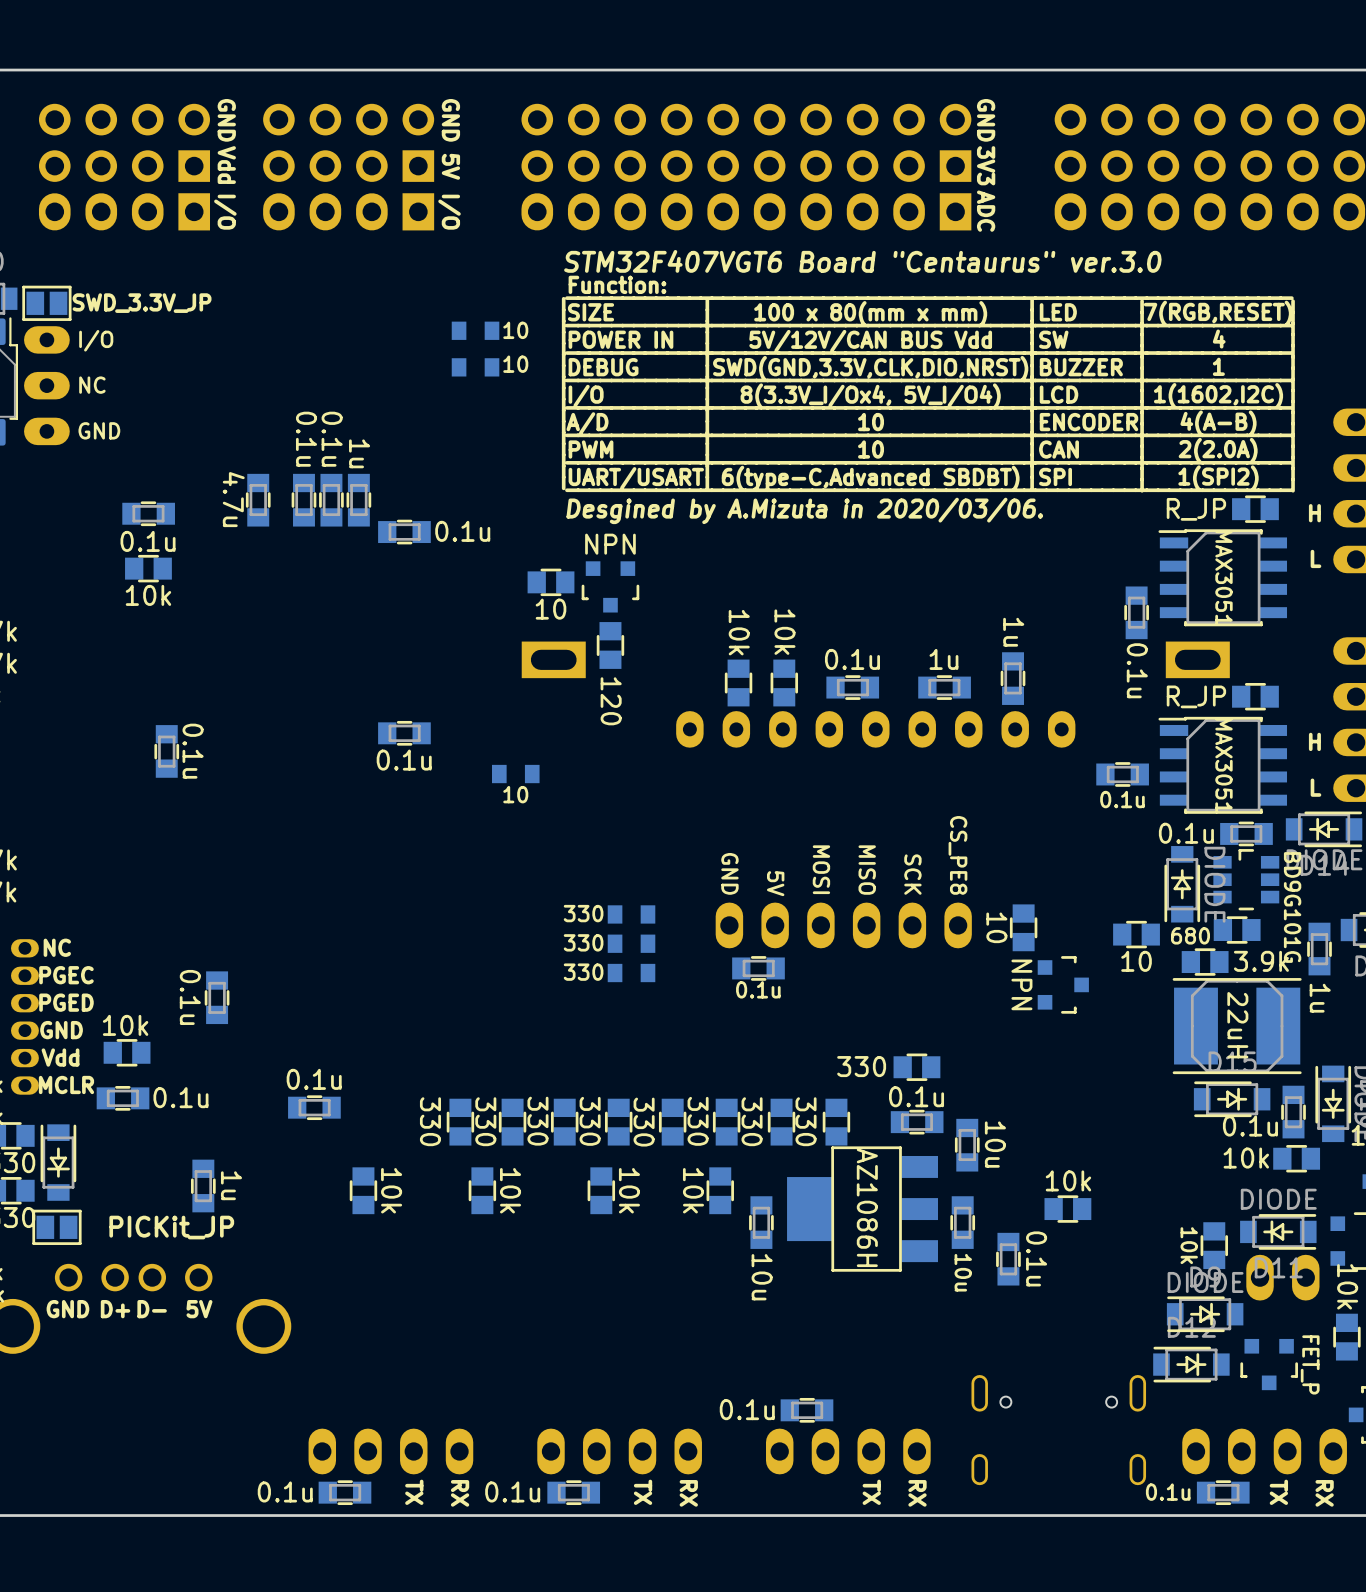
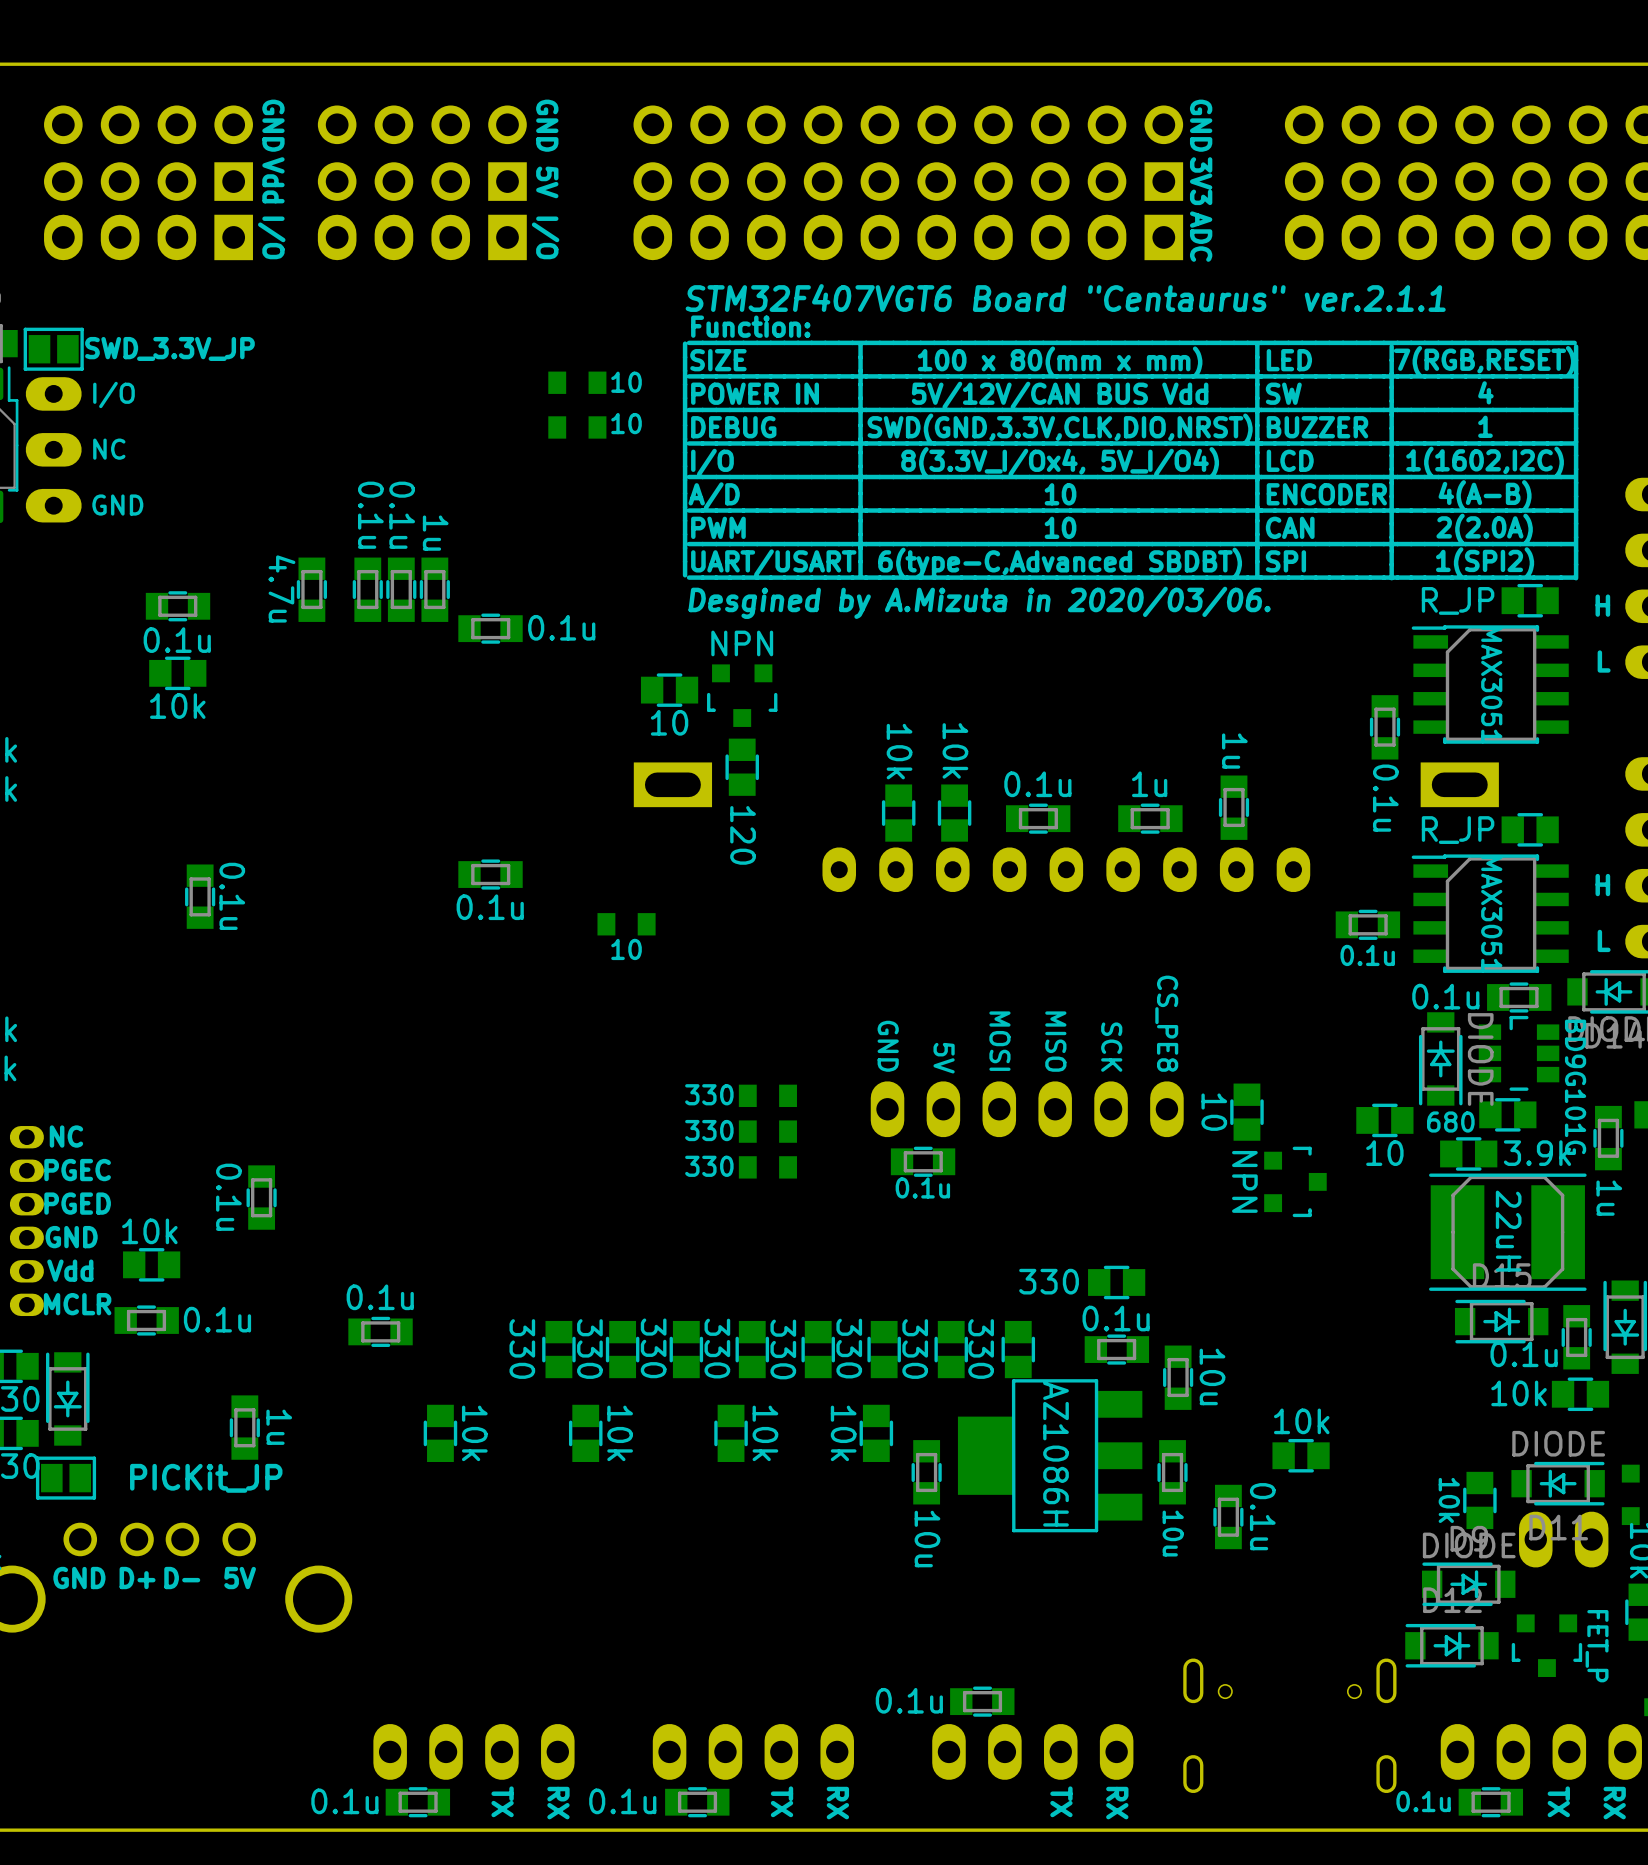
text: STM32F407VGT6 Board "Centaurus" ver.3.0 (862, 261) -> STM32F407VGT6 Board "Centaurus" ver.2.1.1 (1065, 298)

